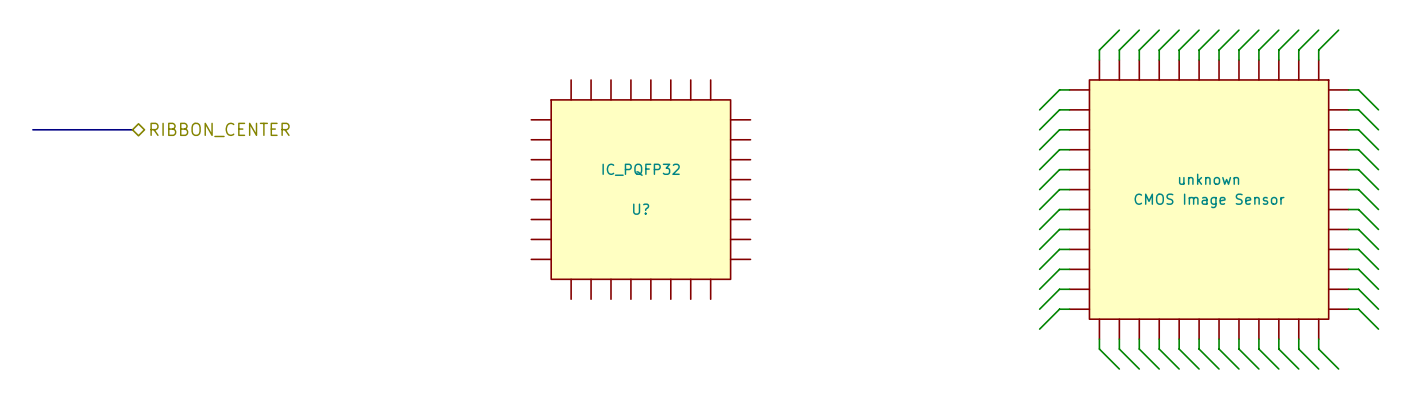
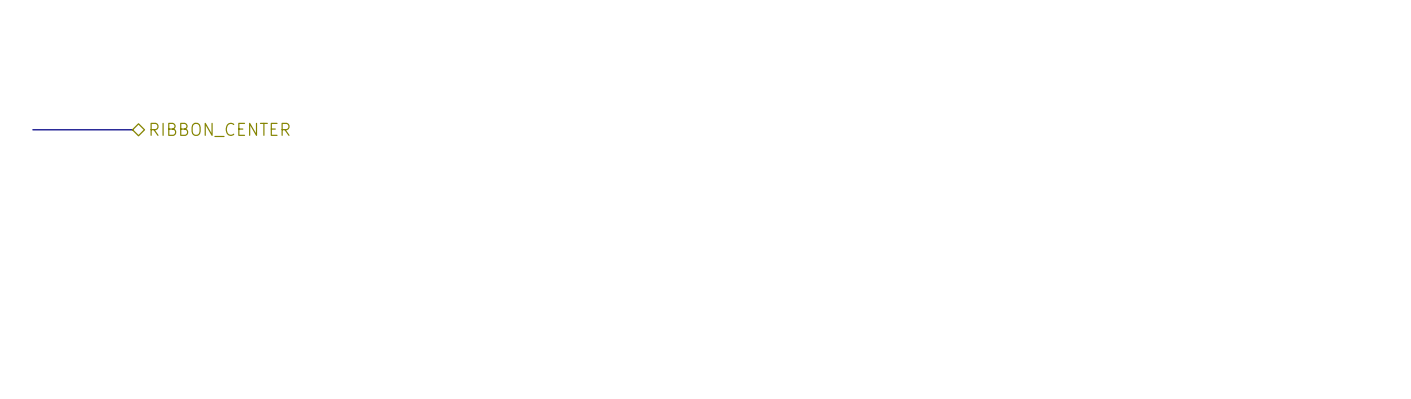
wire: (1119, 30) (1099, 50) (1099, 60) -> none
wire: (1139, 30) (1119, 50) (1119, 60) -> none
wire: (1159, 30) (1139, 50) (1139, 60) -> none
wire: (1179, 30) (1159, 50) (1159, 60) -> none
wire: (1199, 30) (1179, 50) (1179, 60) -> none
wire: (1219, 30) (1199, 50) (1199, 60) -> none
wire: (1238, 30) (1219, 50) (1219, 60) -> none
wire: (1258, 30) (1238, 50) (1238, 60) -> none
wire: (1278, 30) (1258, 50) (1258, 60) -> none
wire: (1298, 30) (1278, 50) (1278, 60) -> none
wire: (1318, 30) (1298, 50) (1298, 60) -> none
wire: (1338, 30) (1318, 50) (1318, 60) -> none
wire: (1069, 89) (1059, 89) (1039, 109) -> none
wire: (1348, 89) (1358, 89) (1378, 109) -> none
wire: (1069, 109) (1059, 109) (1039, 129) -> none
wire: (1348, 109) (1358, 109) (1378, 129) -> none
wire: (1069, 129) (1059, 129) (1039, 149) -> none
wire: (1348, 129) (1358, 129) (1378, 149) -> none
wire: (1069, 149) (1059, 149) (1039, 169) -> none
wire: (1348, 149) (1358, 149) (1378, 169) -> none
wire: (1069, 169) (1059, 169) (1039, 189) -> none
wire: (1348, 169) (1358, 169) (1378, 189) -> none
U?: IC_PQFP32 (640, 189) -> none
wire: (1069, 189) (1059, 189) (1039, 209) -> none
wire: (1348, 189) (1358, 189) (1378, 209) -> none
part: unknown (1209, 199) -> none
wire: (1069, 209) (1059, 209) (1039, 229) -> none
wire: (1348, 209) (1358, 209) (1378, 229) -> none
wire: (1069, 229) (1059, 229) (1039, 249) -> none
wire: (1348, 229) (1358, 229) (1378, 249) -> none
wire: (1069, 249) (1059, 249) (1039, 269) -> none
wire: (1348, 249) (1358, 249) (1378, 269) -> none
wire: (1069, 269) (1059, 269) (1039, 289) -> none
wire: (1348, 269) (1358, 269) (1378, 289) -> none
wire: (1069, 289) (1059, 289) (1039, 309) -> none
wire: (1348, 289) (1358, 289) (1378, 309) -> none
wire: (1069, 309) (1059, 309) (1039, 329) -> none
wire: (1348, 309) (1358, 309) (1378, 329) -> none
wire: (1099, 339) (1099, 349) (1119, 369) -> none
wire: (1119, 339) (1119, 349) (1139, 369) -> none
wire: (1139, 339) (1139, 349) (1159, 369) -> none
wire: (1159, 339) (1159, 349) (1179, 369) -> none
wire: (1179, 339) (1179, 349) (1199, 369) -> none
wire: (1199, 339) (1199, 349) (1219, 369) -> none
wire: (1219, 339) (1219, 349) (1238, 369) -> none
wire: (1238, 339) (1238, 349) (1258, 369) -> none
wire: (1258, 339) (1258, 349) (1278, 369) -> none
wire: (1278, 339) (1278, 349) (1298, 369) -> none
wire: (1298, 339) (1298, 349) (1318, 369) -> none
wire: (1318, 339) (1318, 349) (1338, 369) -> none

